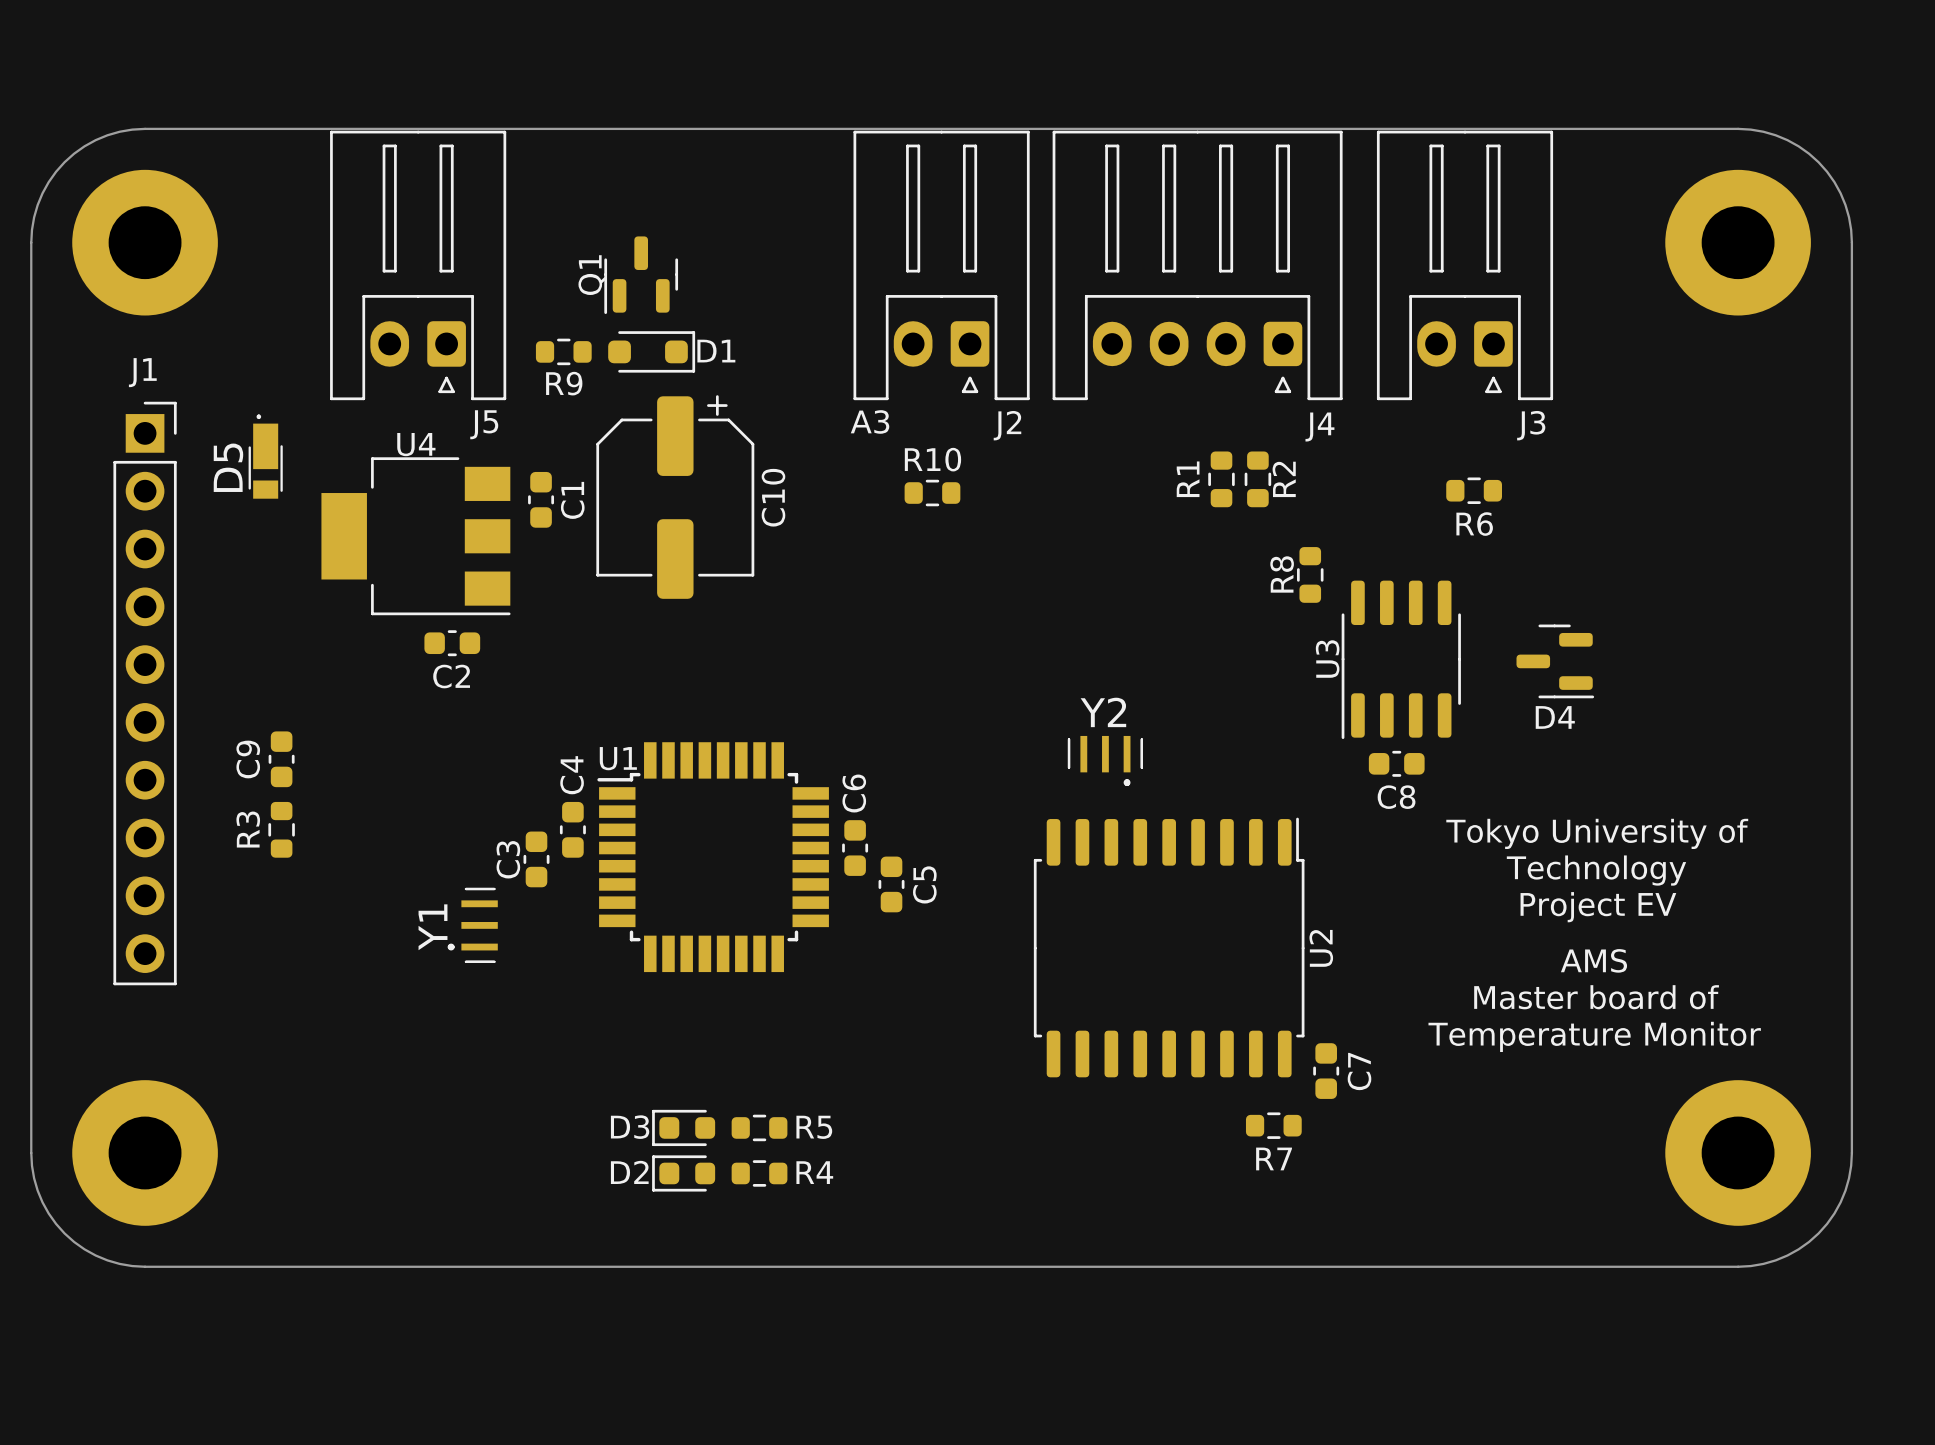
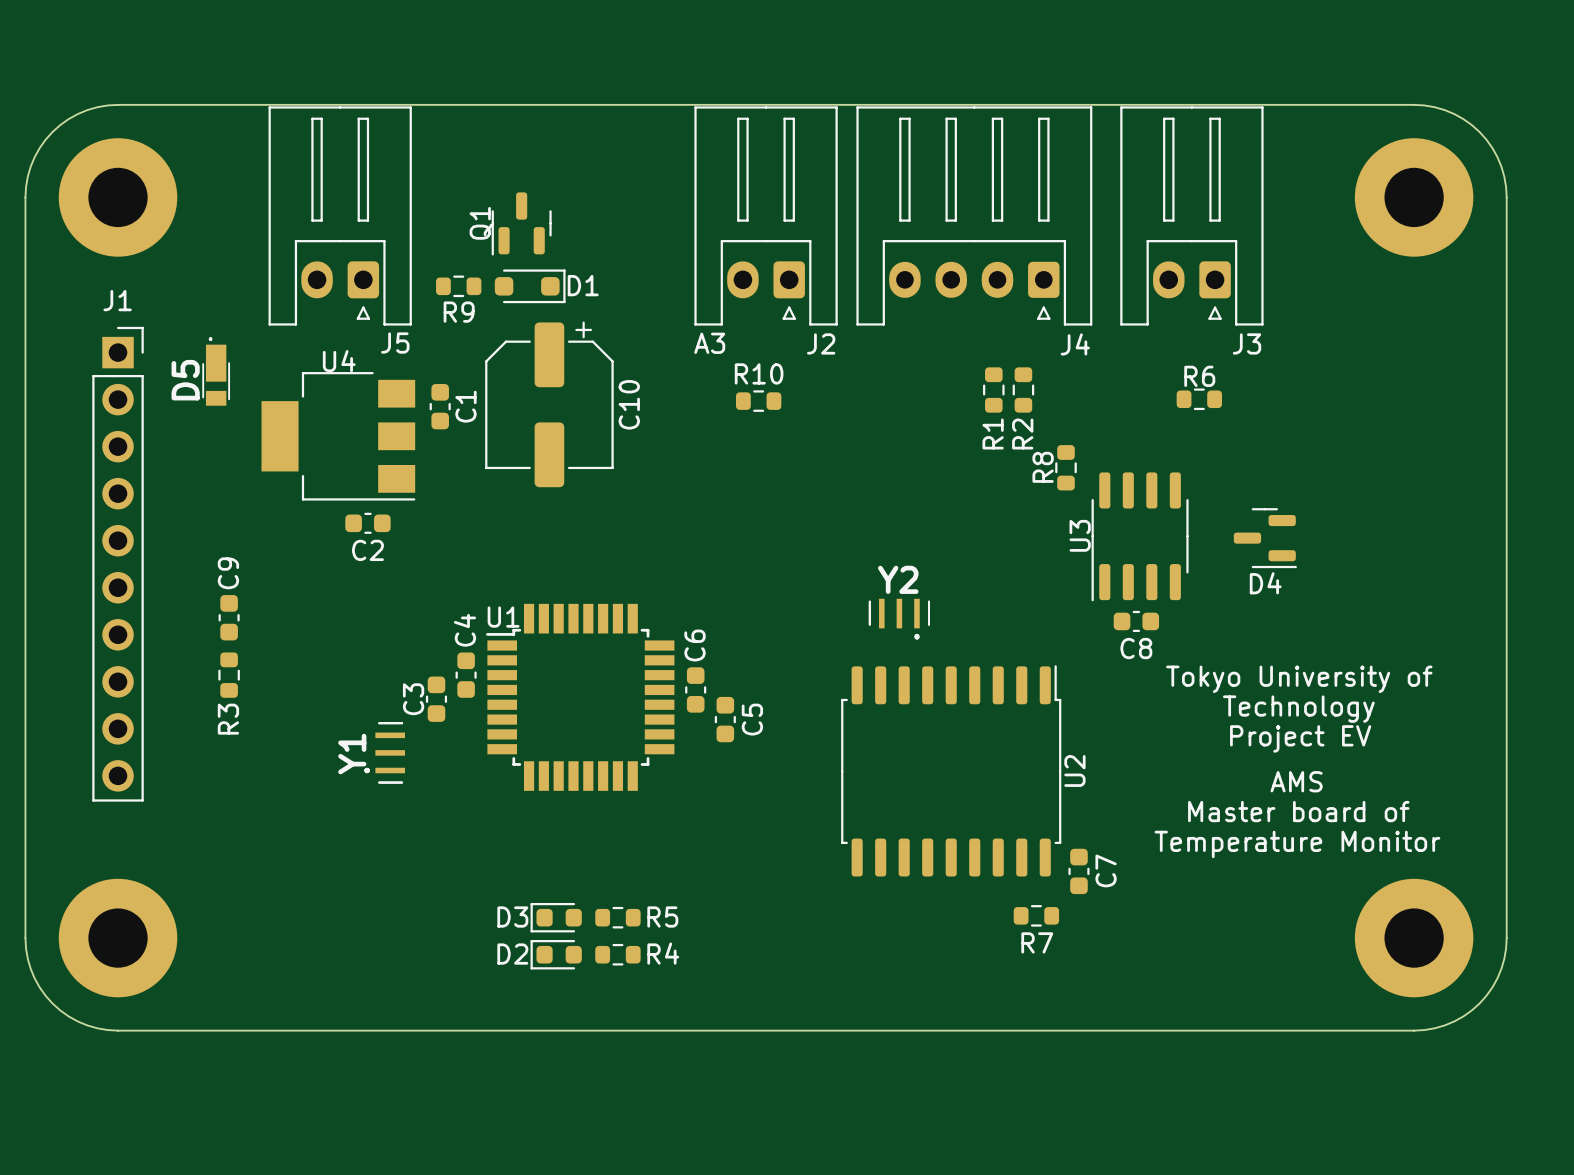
R1 name position: R1 (1188, 479) -> R1 (993, 434)
R2 name position: R2 (1284, 479) -> R2 (1022, 434)
R6 name position: R6 (1474, 524) -> R6 (1199, 376)
C9 name position: C9 (248, 759) -> C9 (228, 573)
R3 name position: R3 (248, 829) -> R3 (228, 719)

